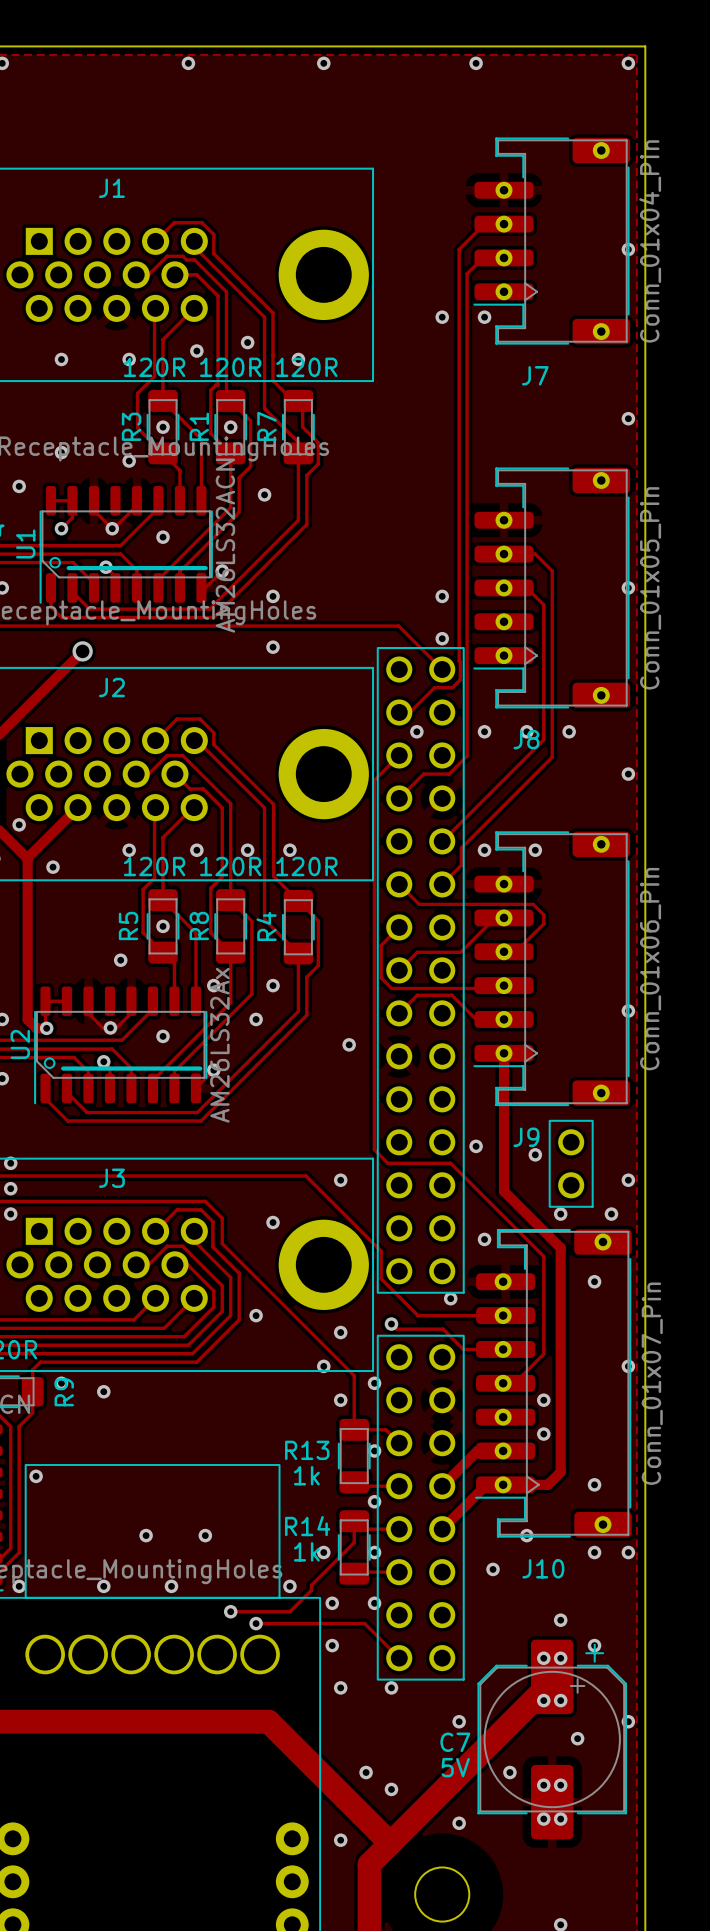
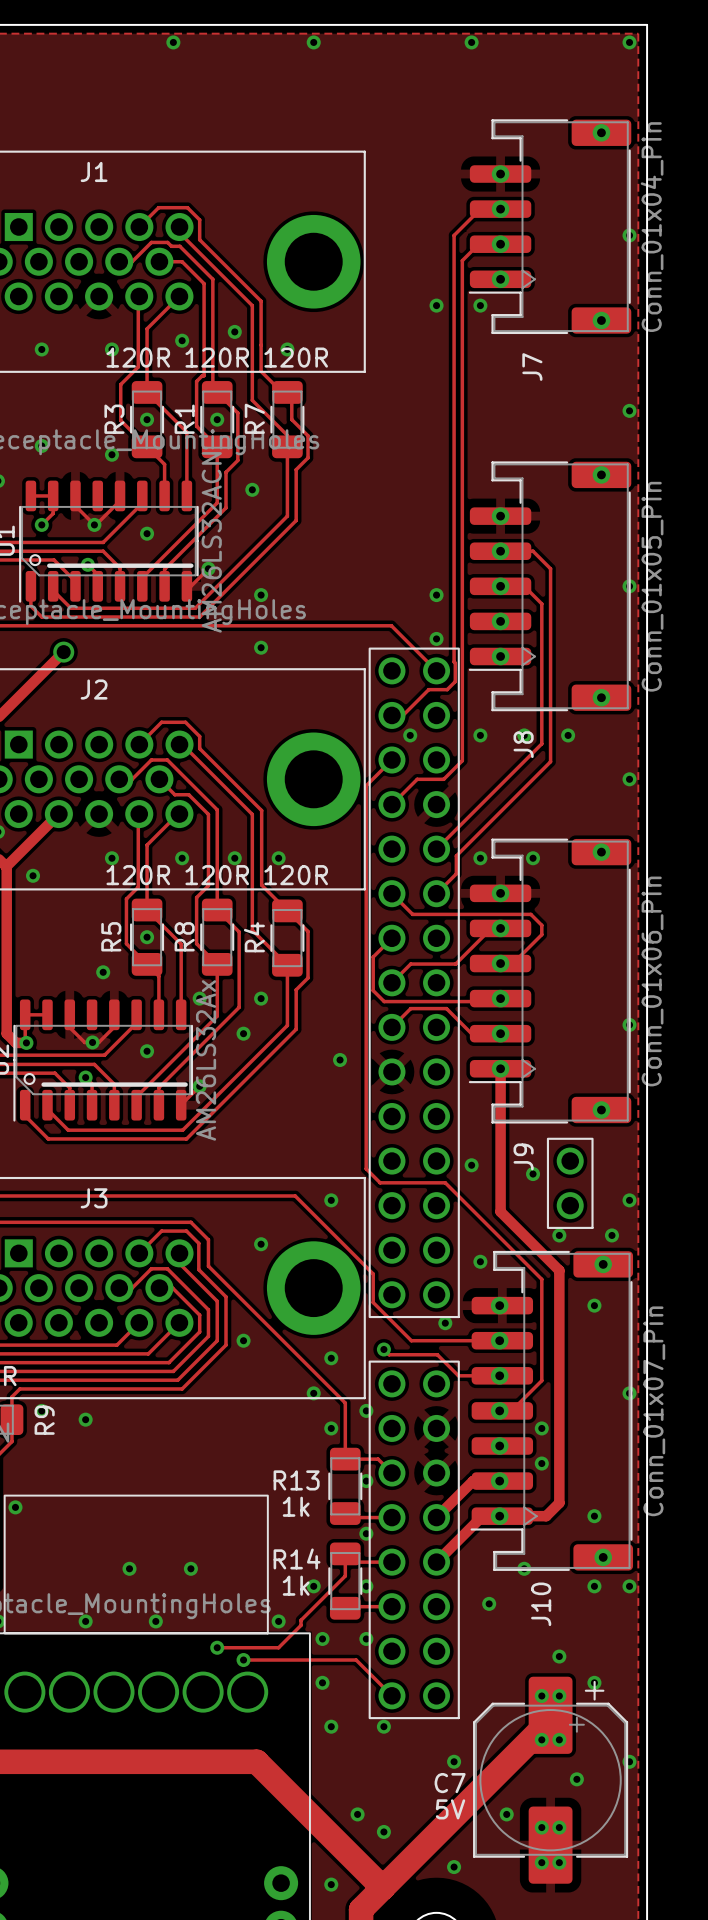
J7 name rotation: 0° (535, 375) -> 90° counterclockwise (532, 367)
J8 name rotation: 0° (526, 739) -> 90° counterclockwise (523, 744)
J9 name rotation: 0° (526, 1137) -> 90° counterclockwise (523, 1156)
J10 name rotation: 0° (543, 1568) -> 90° counterclockwise (541, 1604)

